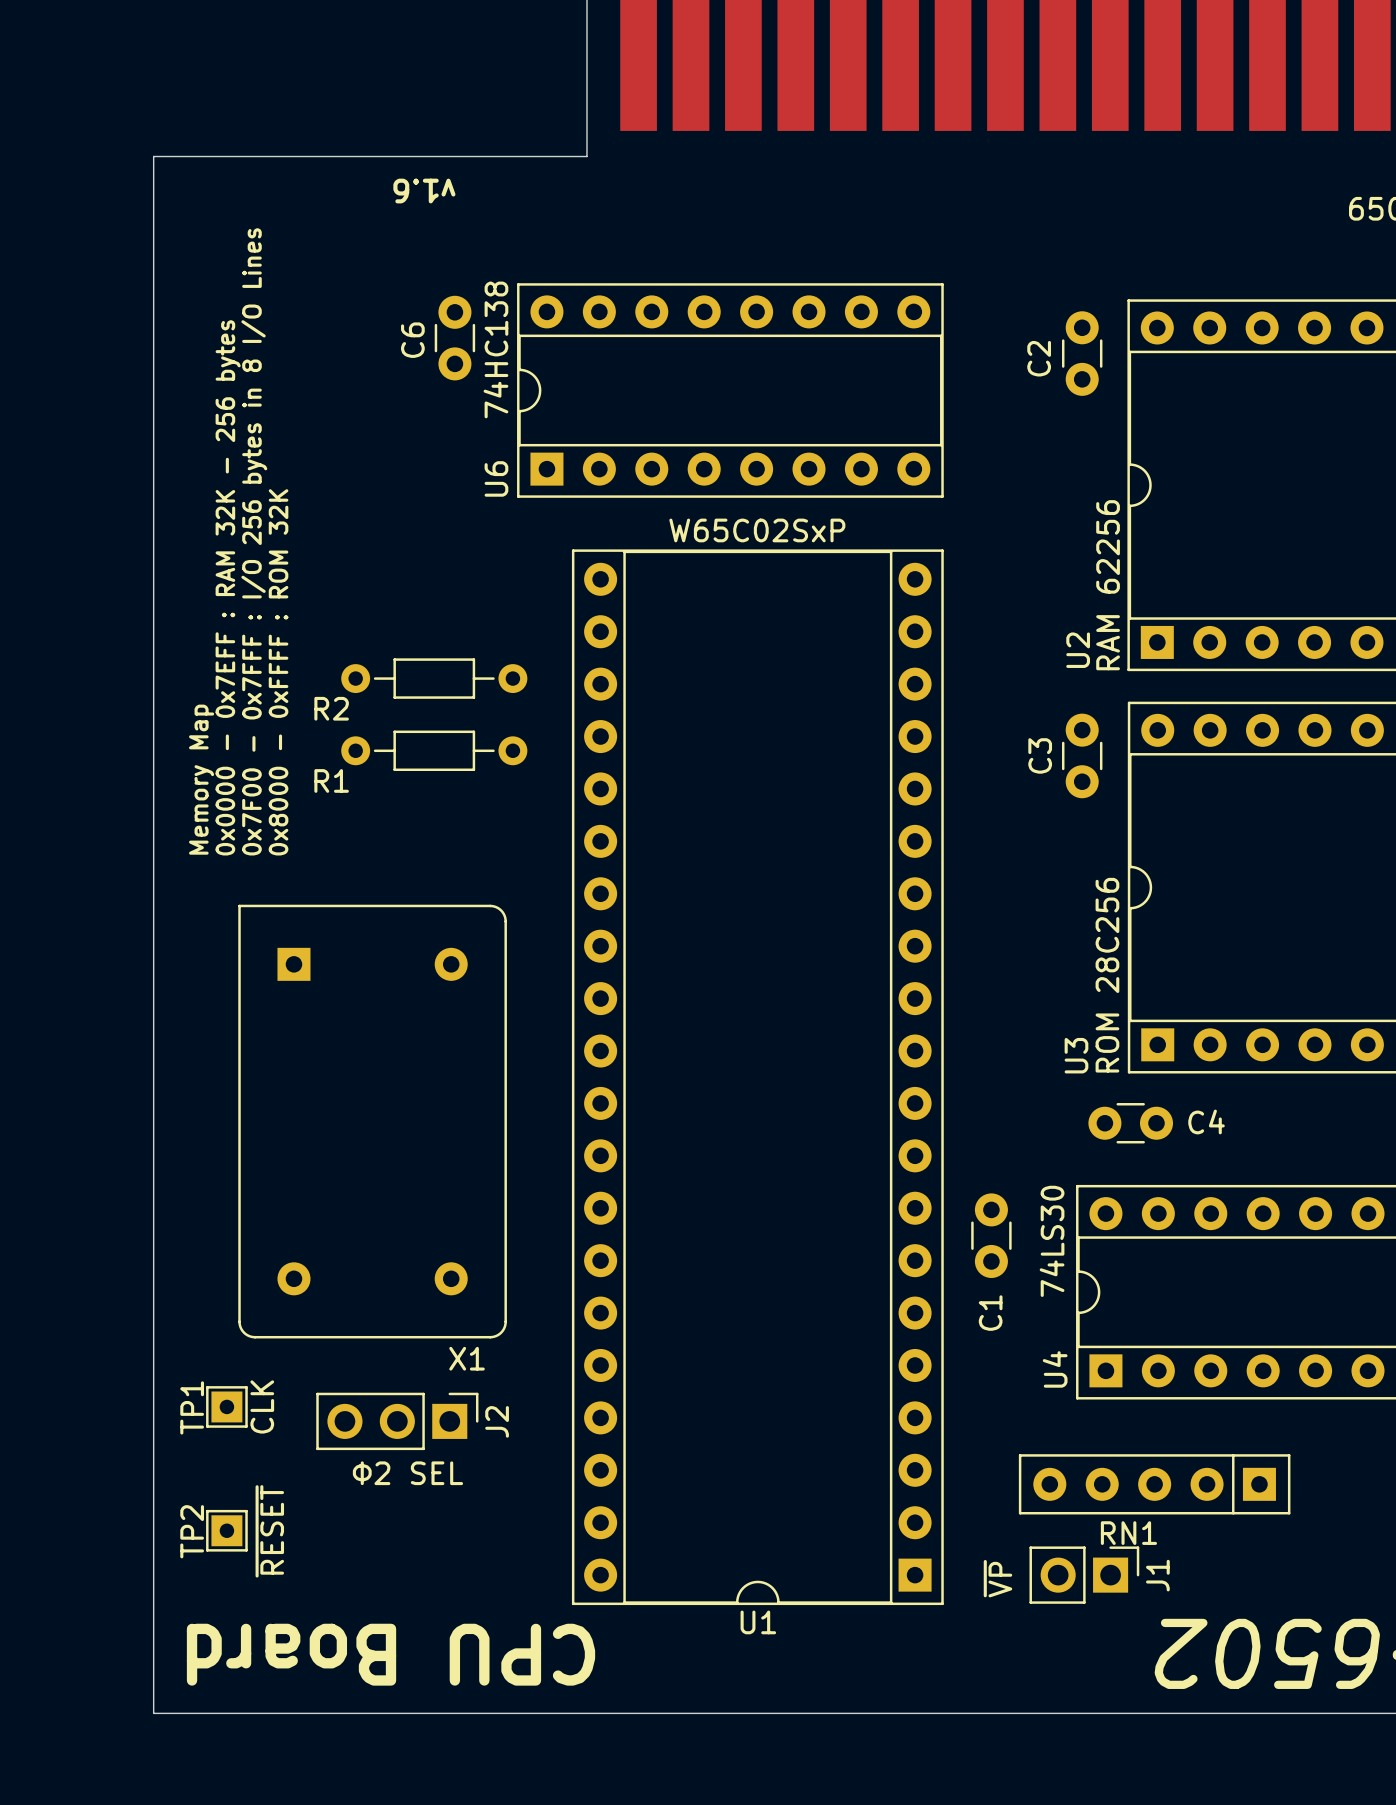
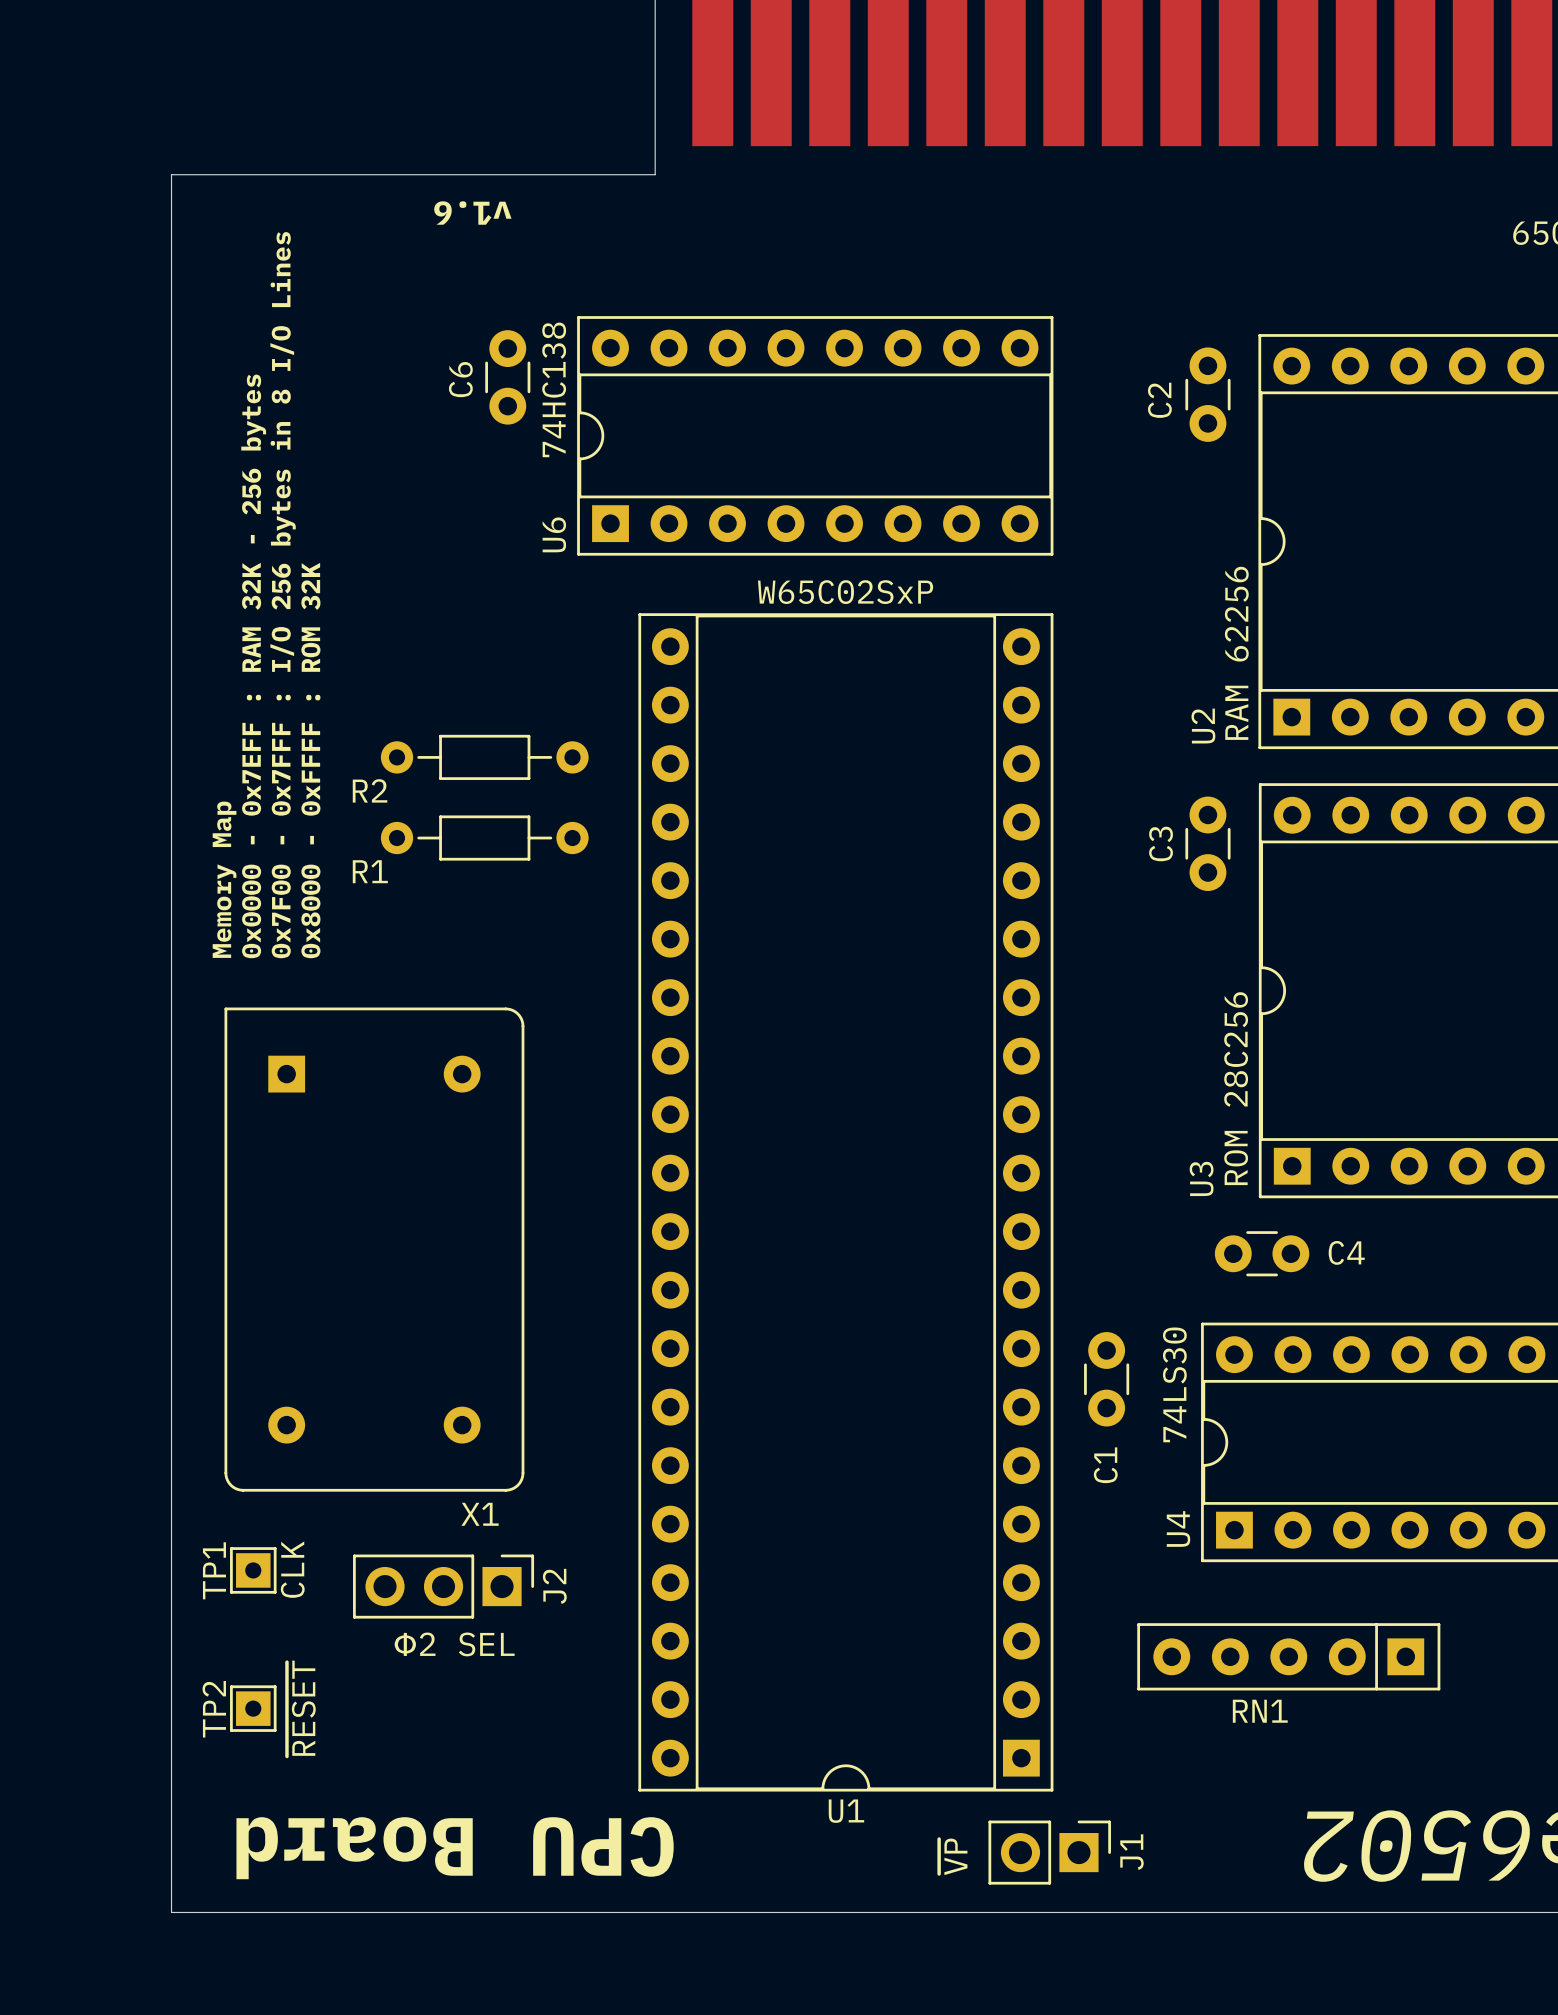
X1 position: (372, 1121) -> (374, 1249)
J1 position: (1084, 1575) -> (1049, 1852)

